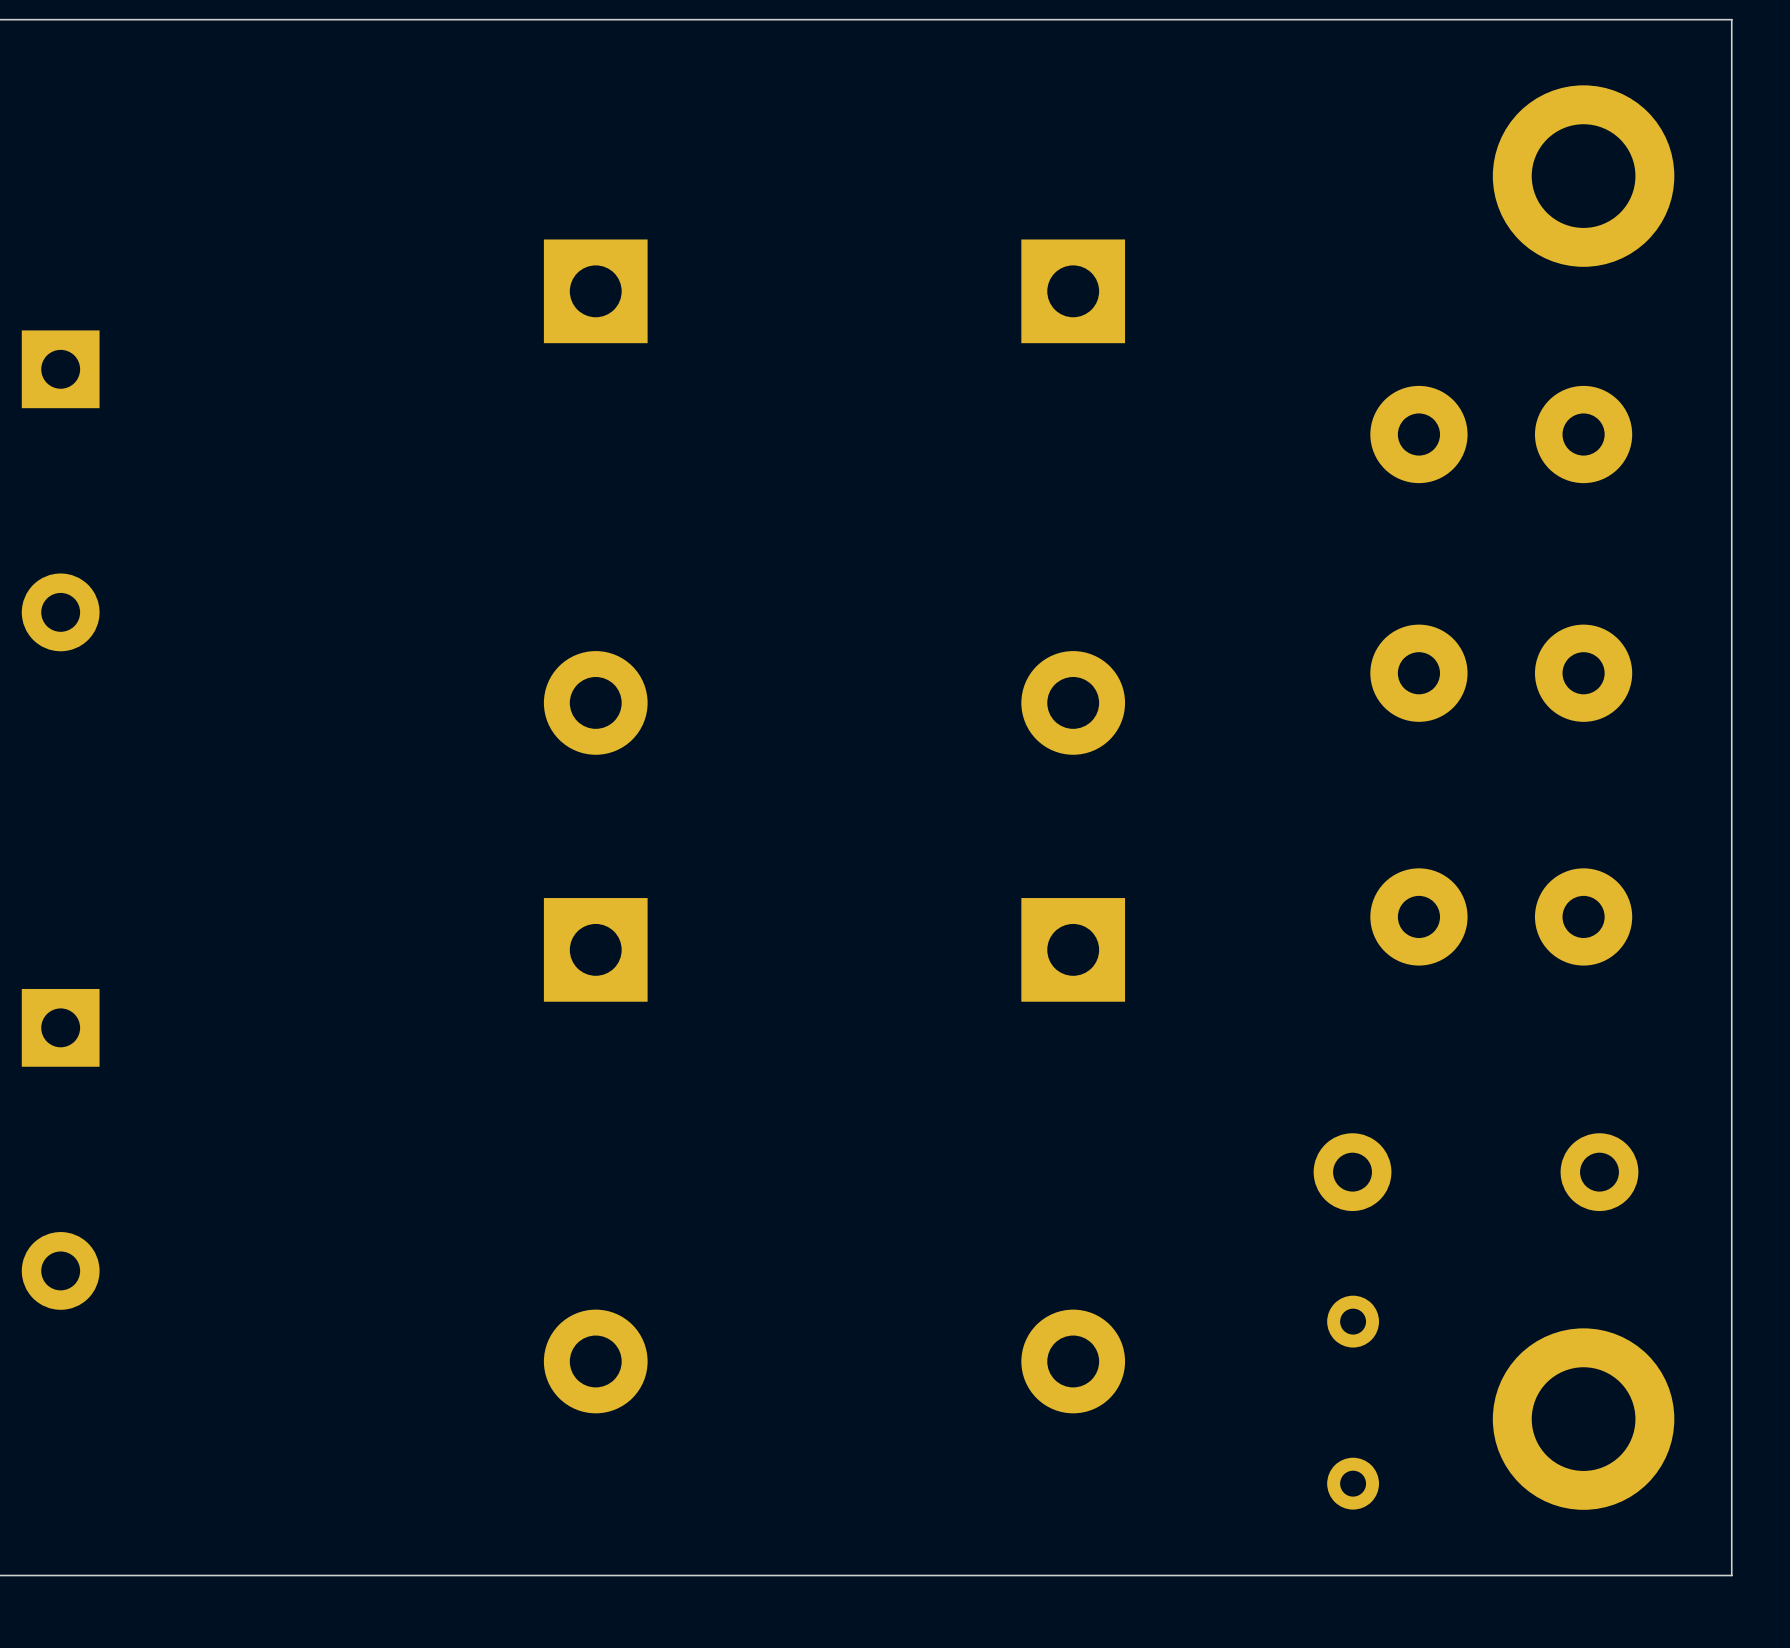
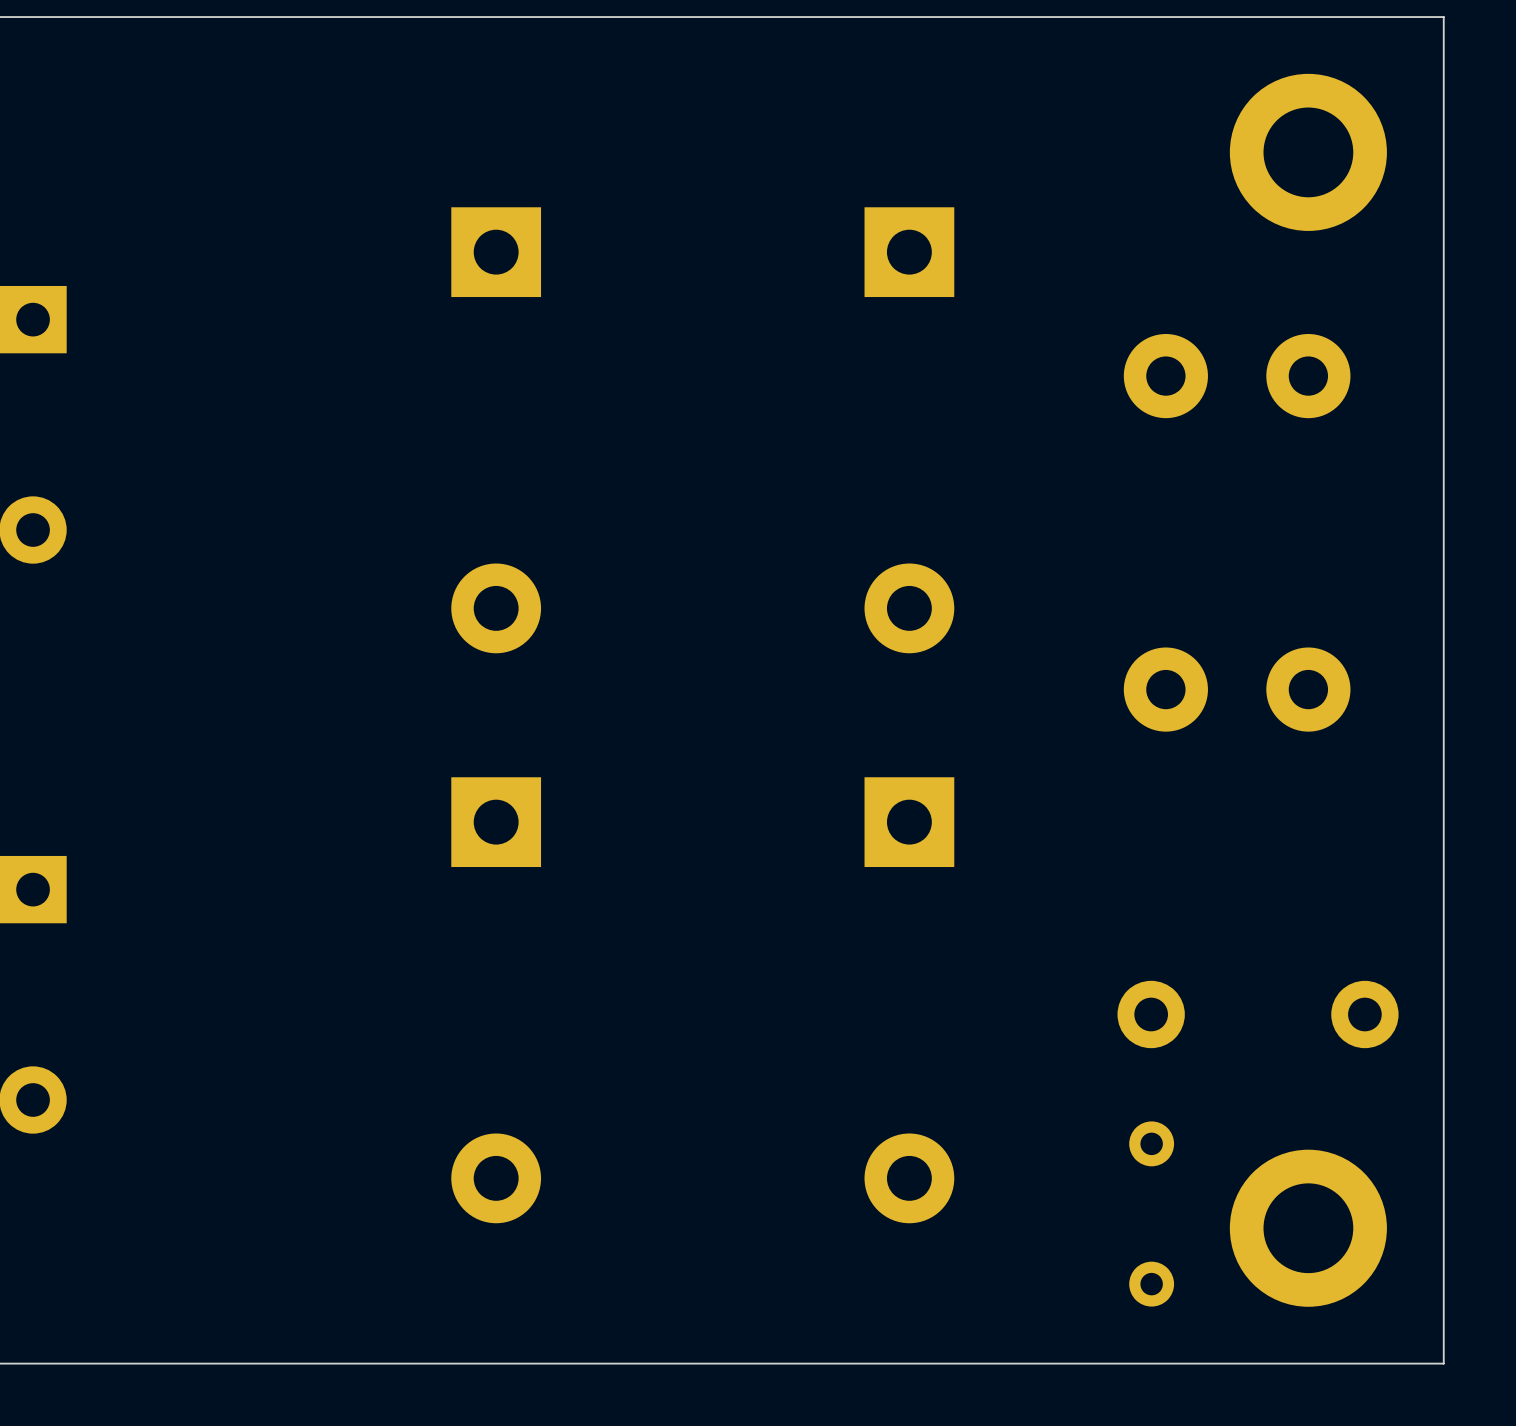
board edge: (1690, 19) (1731, 19) (1731, 1575) (1690, 1575) -> (1443, 17) (1443, 1363)
part position: (1583, 176) -> (1308, 152)
part: none -> (1237, 376)
part: (1501, 434) -> none
part: (1501, 673) -> none
part: none -> (1237, 689)
part: (1501, 916) -> none
part position: (1583, 1419) -> (1308, 1228)

